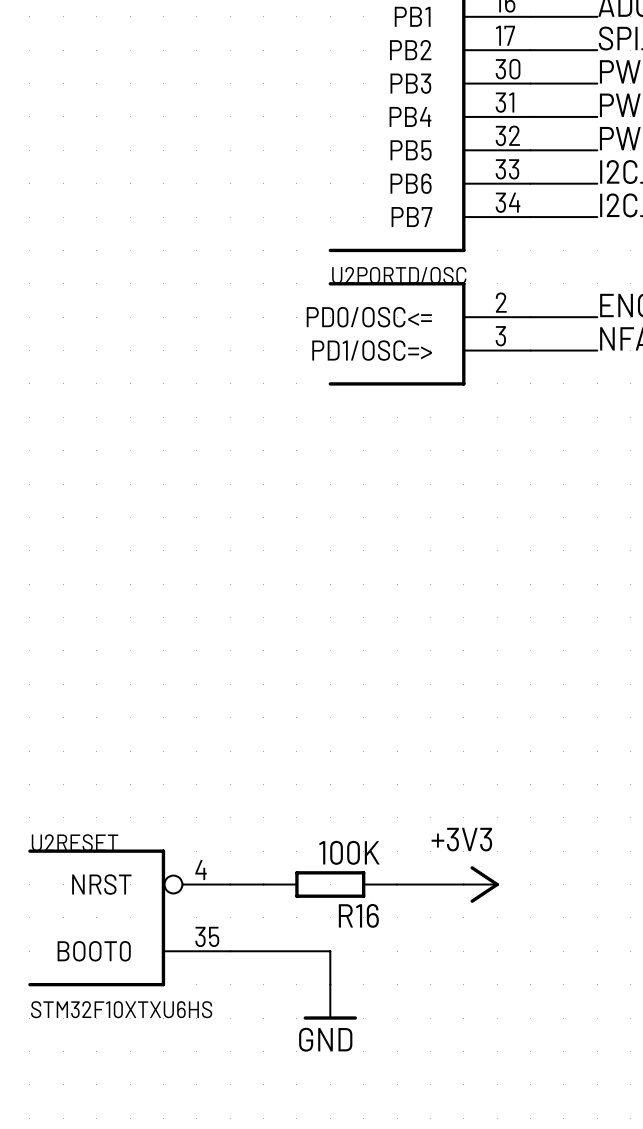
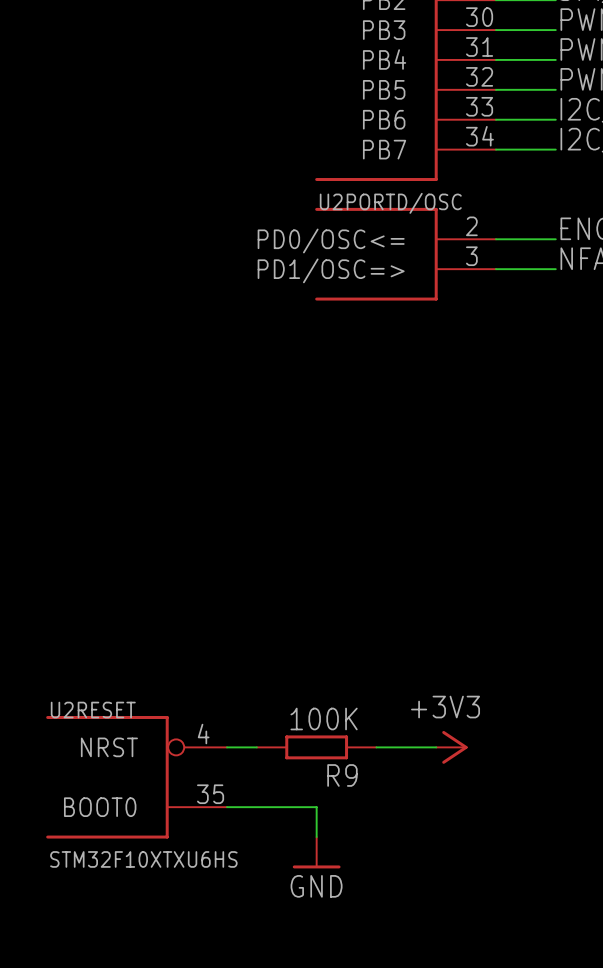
R16 name: R16 (358, 915) -> R9 (342, 775)

